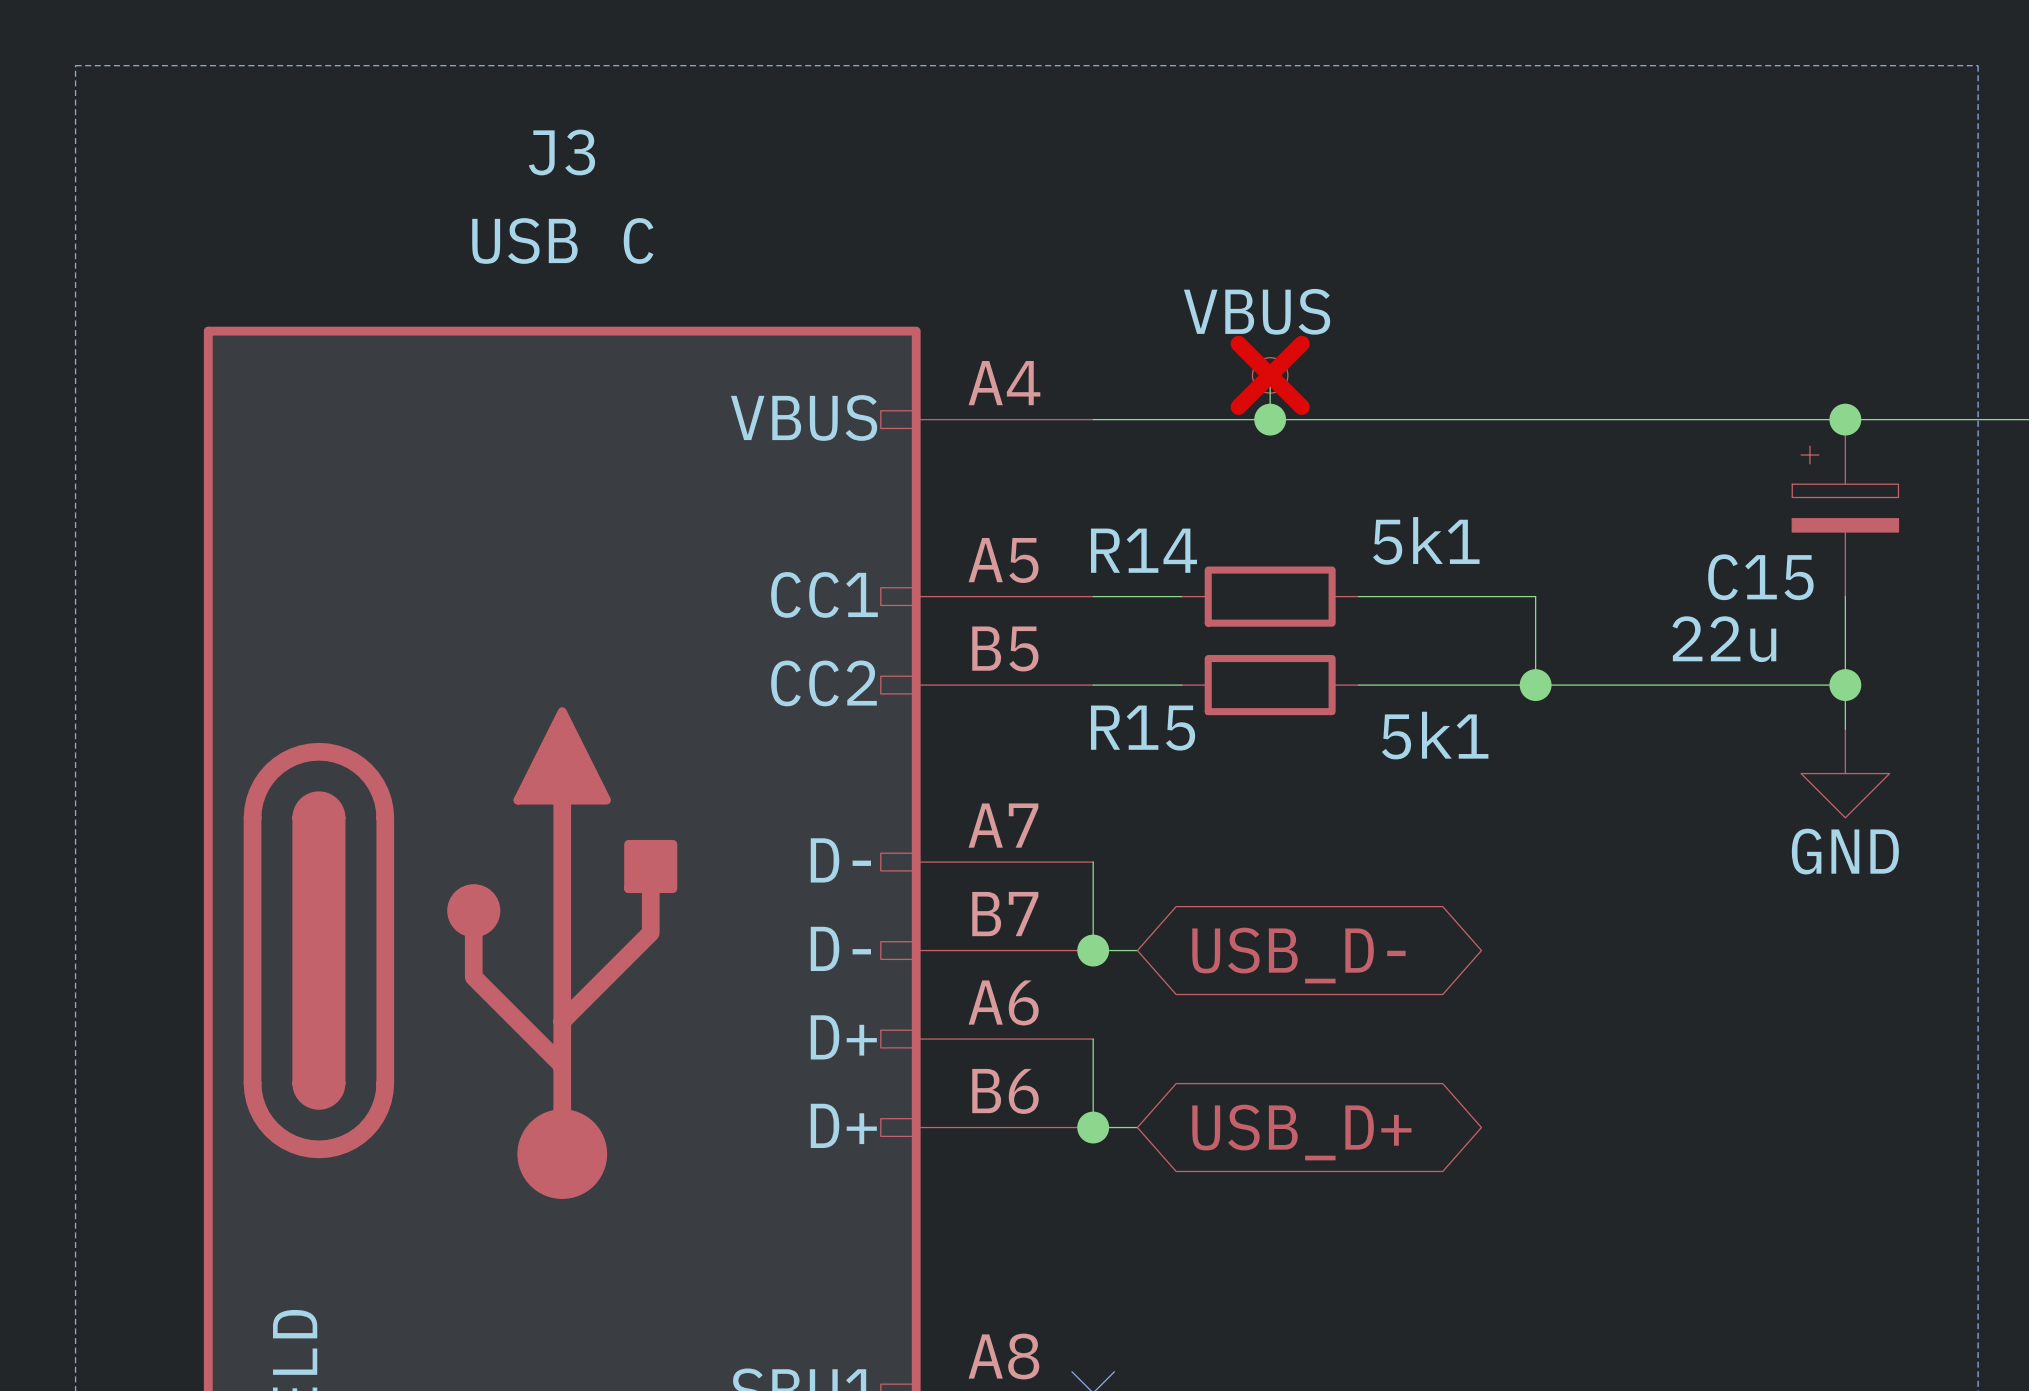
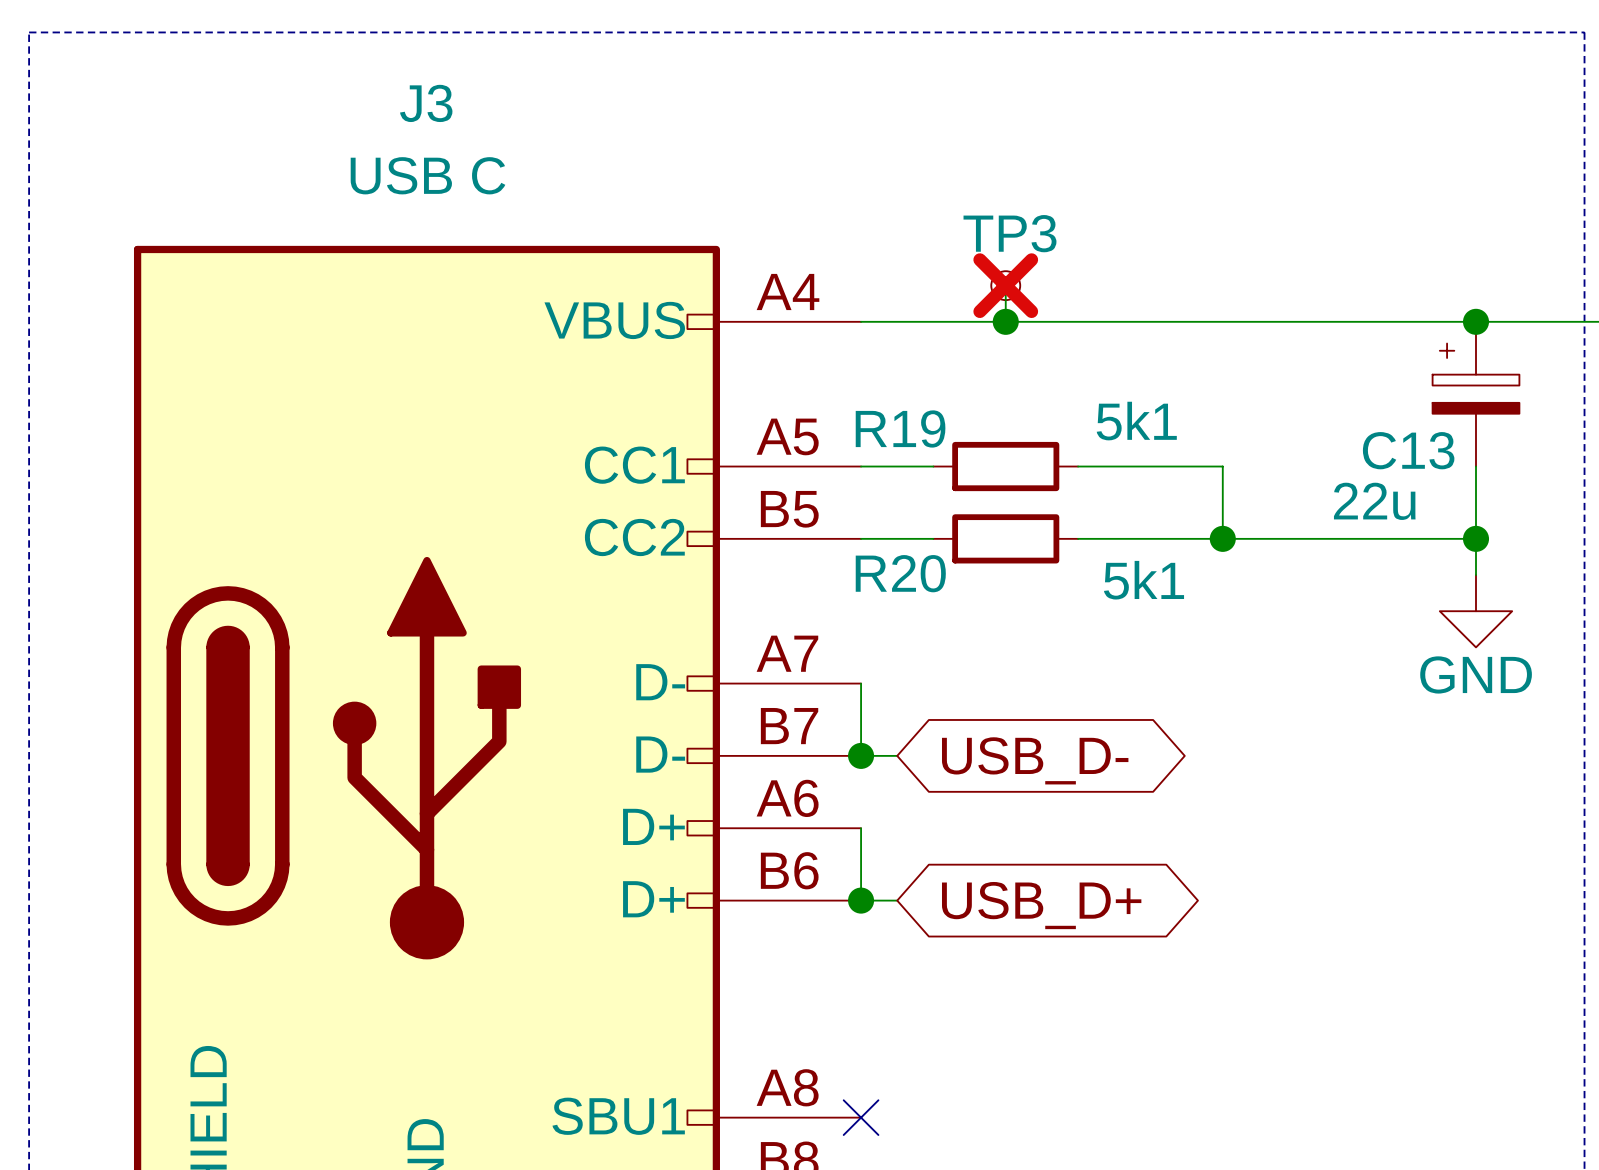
TP3 value: VBUS (1257, 311) -> none
TP3 name: none -> TP3 (1009, 233)
R14 name: R14 (1143, 550) -> R19 (900, 428)
C15 name: C15 (1760, 577) -> C13 (1408, 450)
R15 name: R15 (1143, 728) -> R20 (900, 573)

